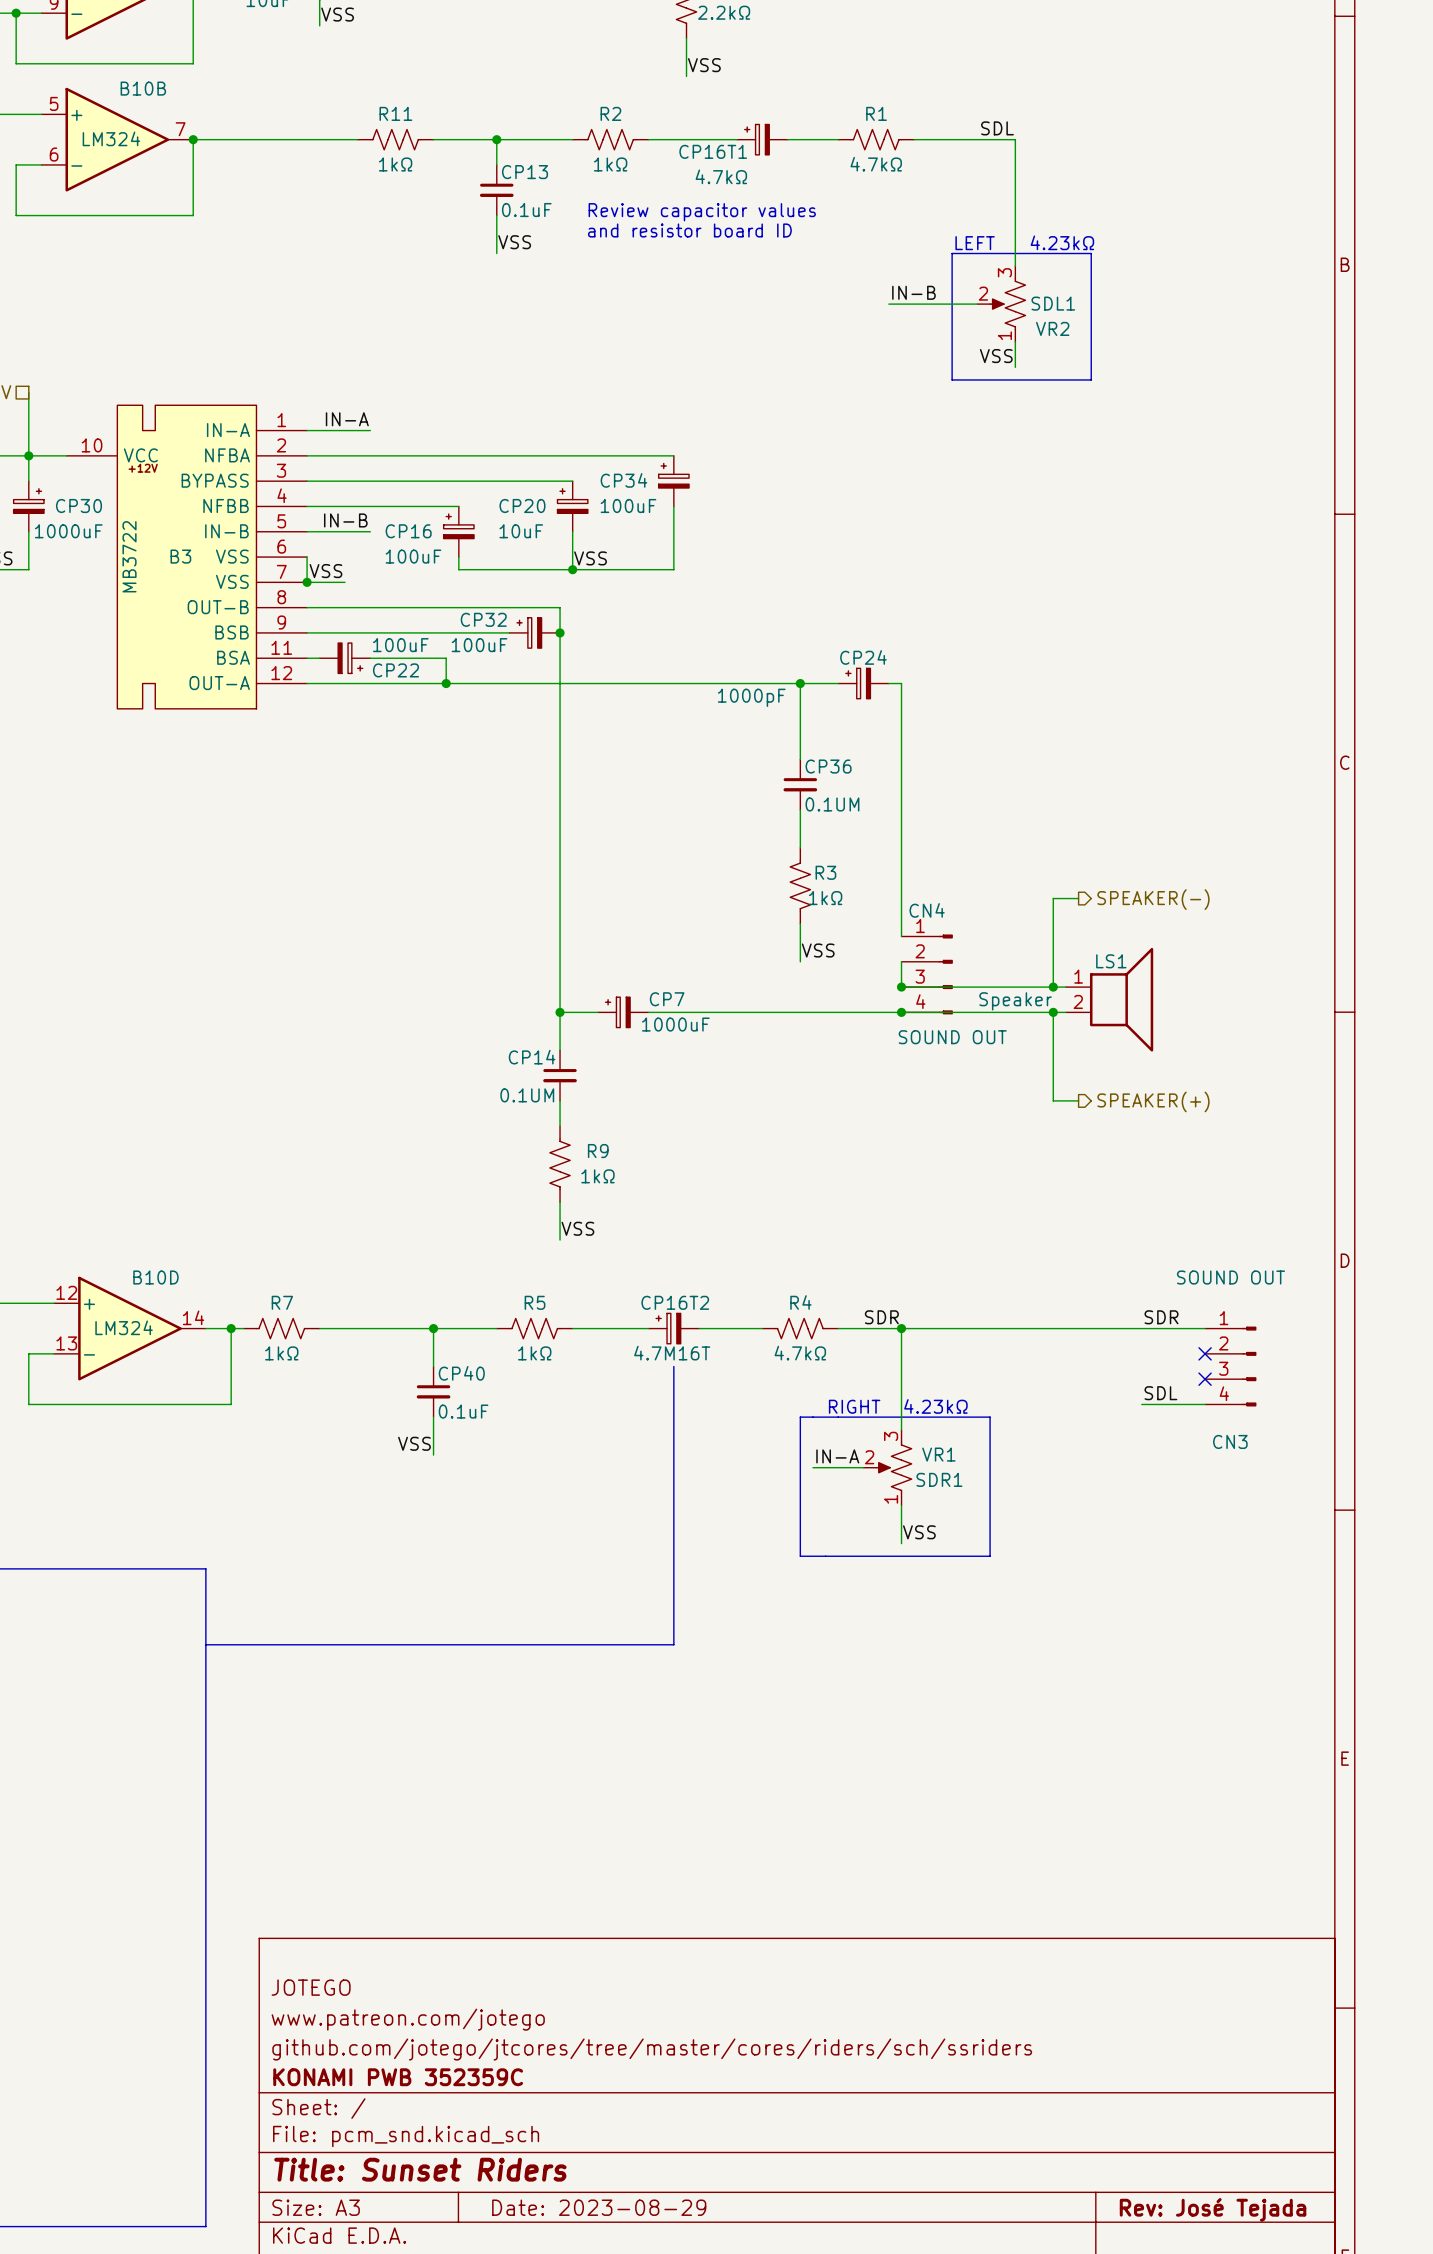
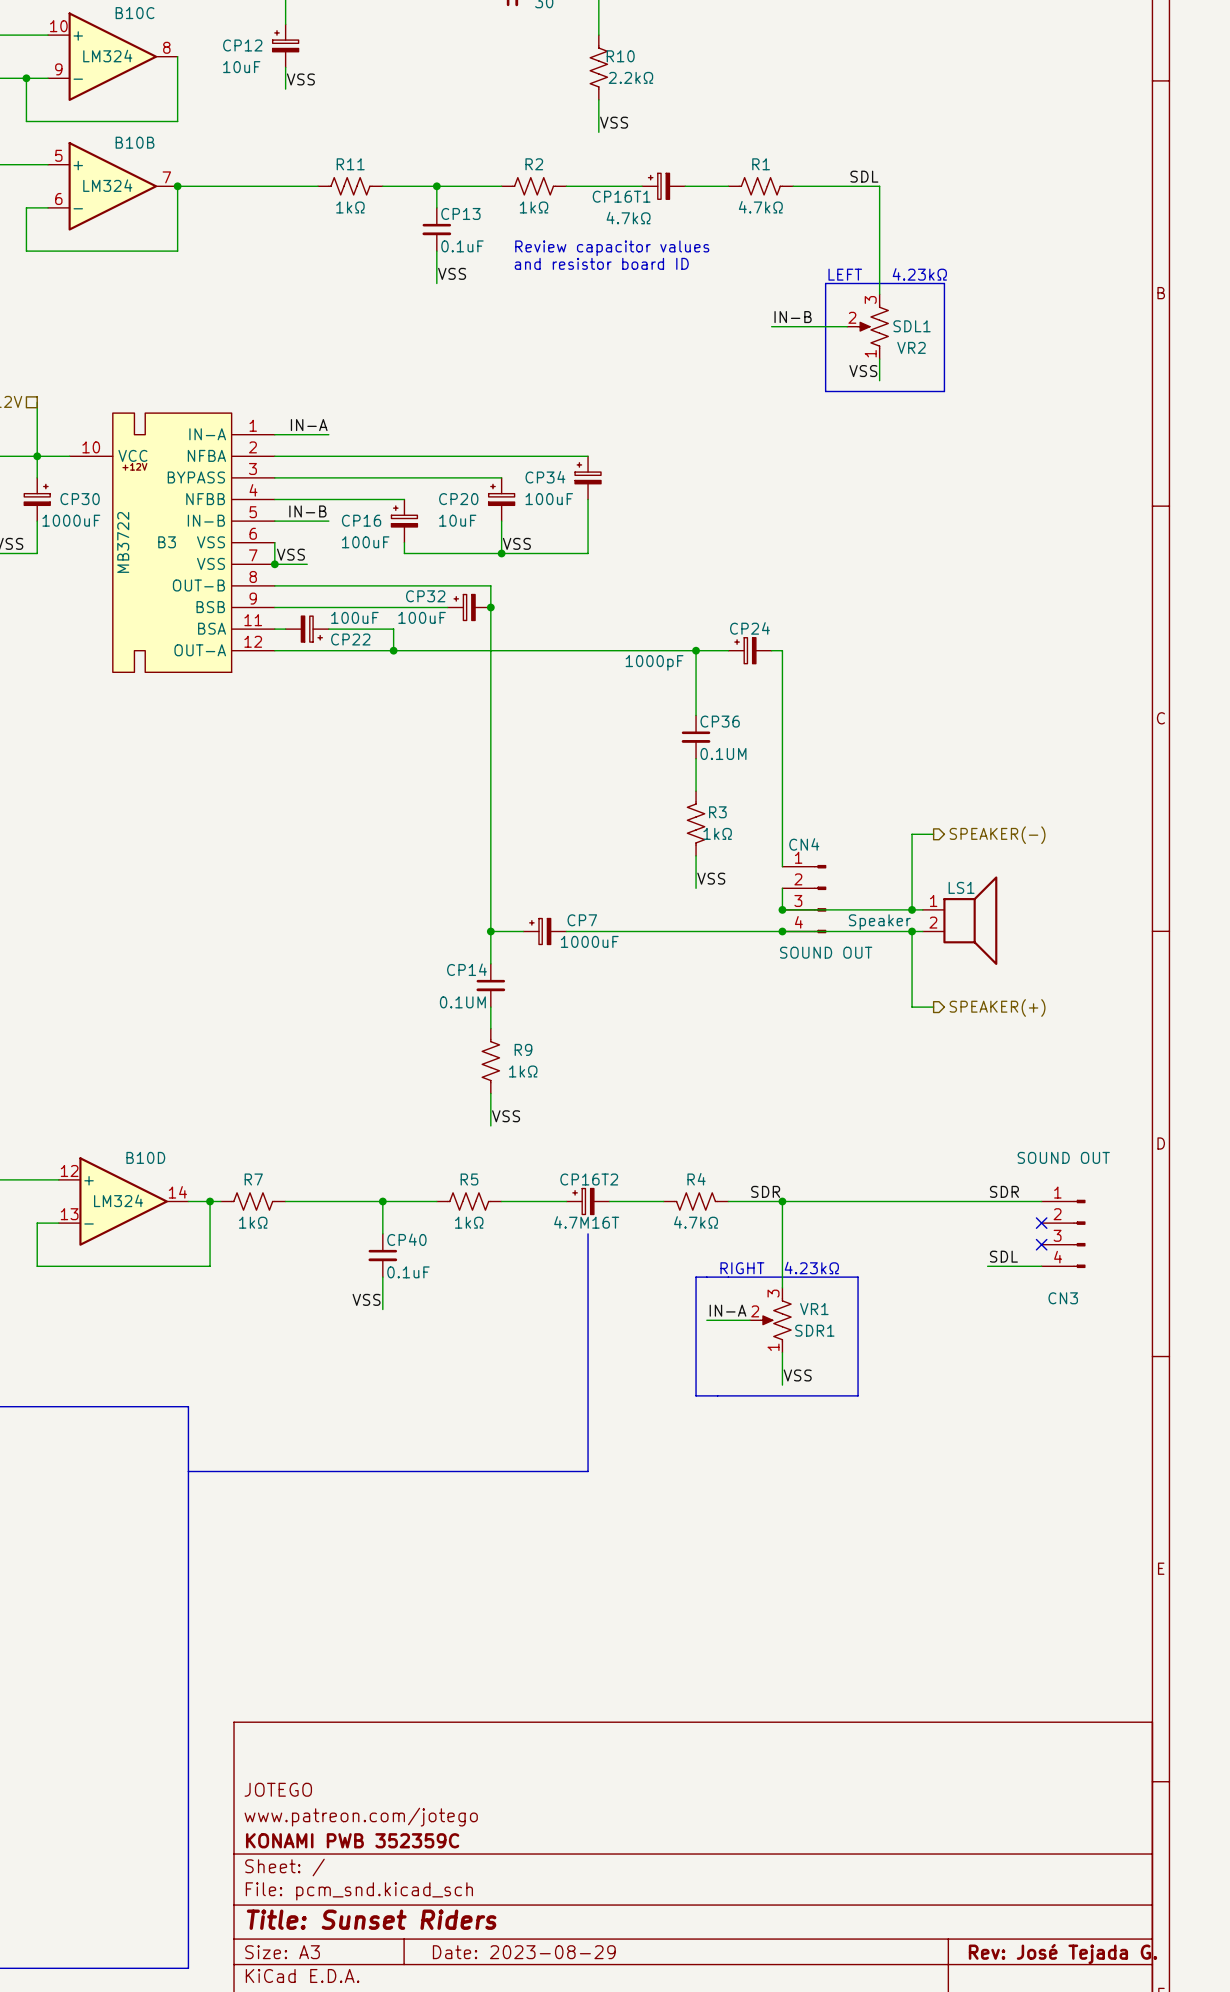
title block: JOTEGO (311, 1987) -> none
title block: www.patreon.com/jotego (408, 2019) -> JOTEGO (278, 1789)
title block: github.com/jotego/jtcores/tree/master/cores/riders/sch/ssriders (652, 2049) -> www.patreon.com/jotego (361, 1817)
title block: Rev: José Tejada (1213, 2209) -> Rev: José Tejada G. (1063, 1954)

